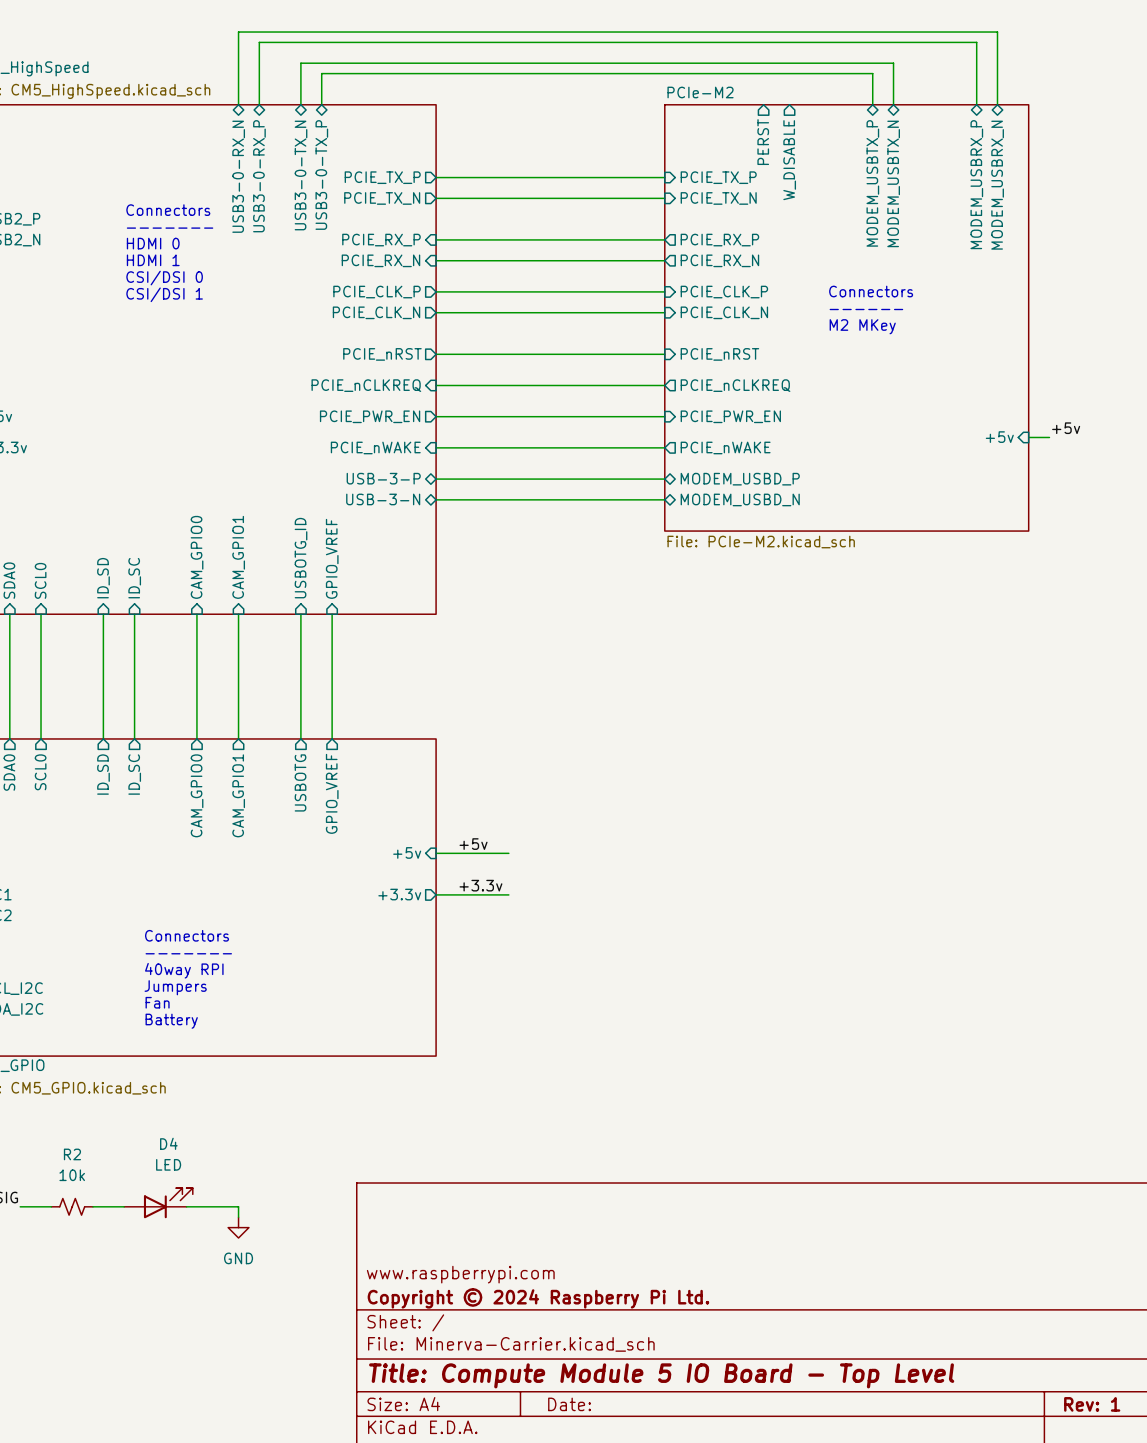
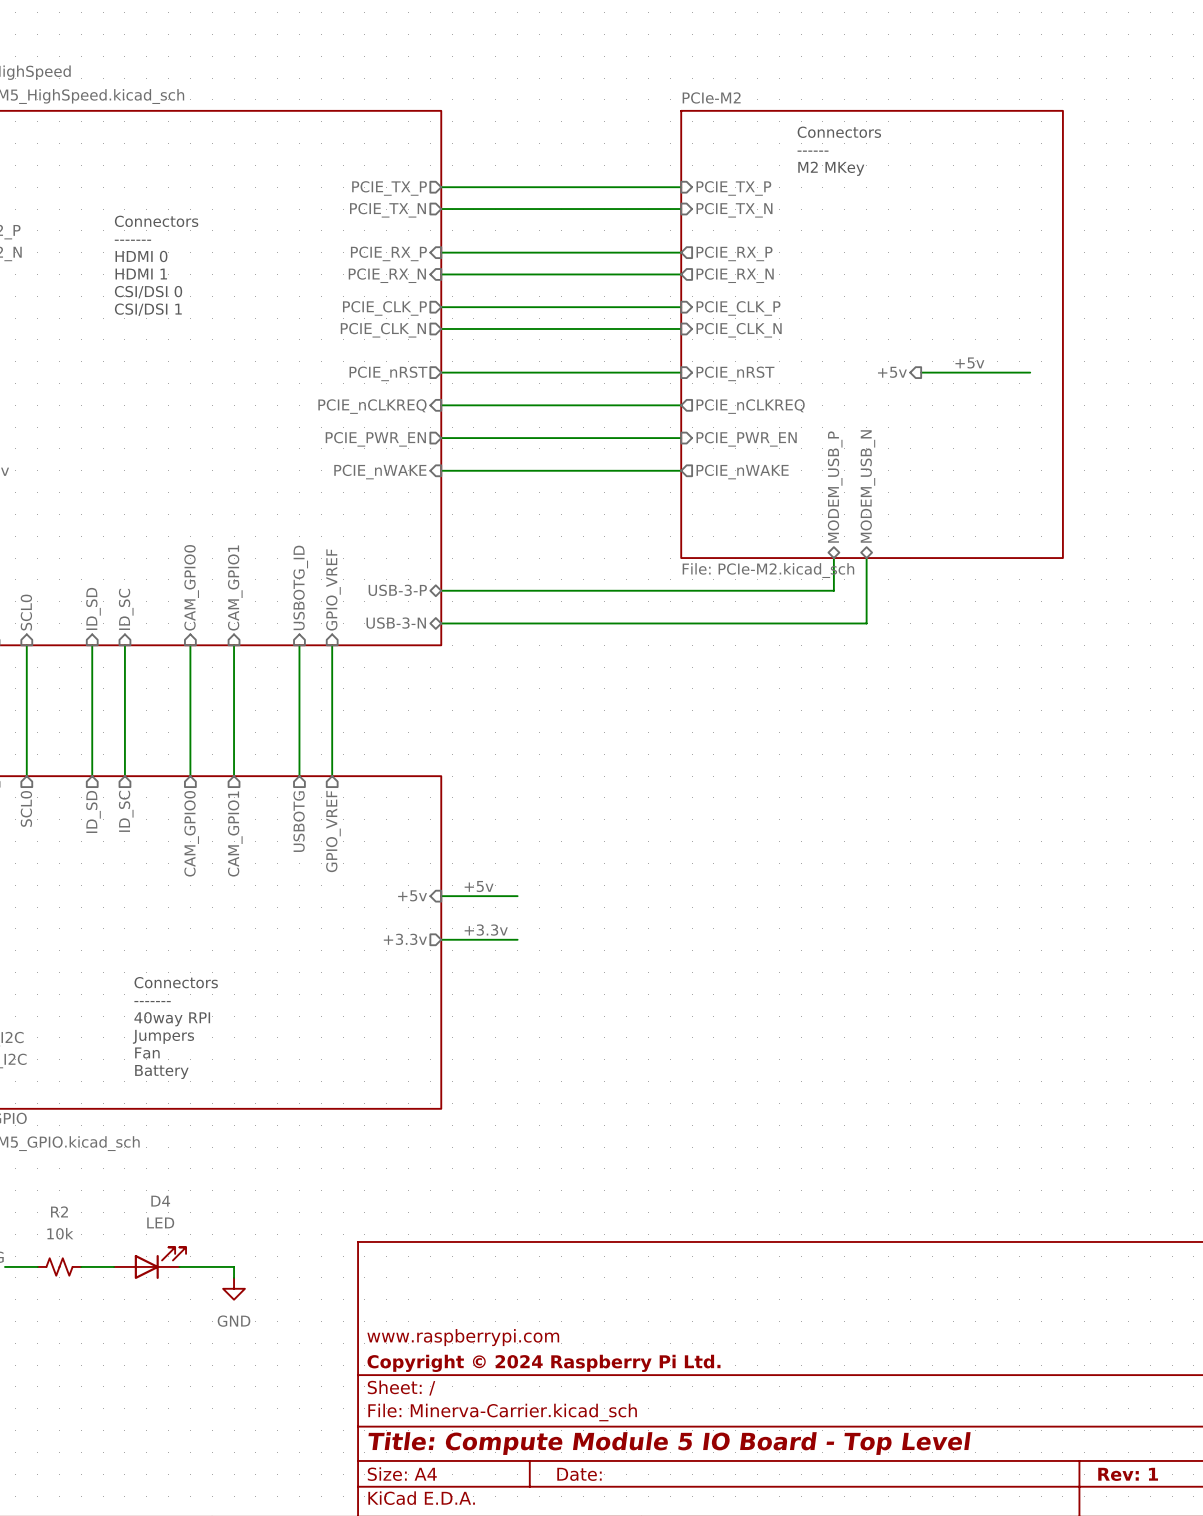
wire: (238, 104) (238, 32) (997, 32) (997, 104) -> none
wire: (259, 104) (259, 42) (976, 42) (976, 104) -> none
wire: (300, 104) (300, 63) (893, 63) (893, 104) -> none
wire: (321, 104) (321, 73) (872, 73) (872, 104) -> none
sheet pin: PERST (763, 142) -> none
sheet pin: W_DISABLE (789, 160) -> none
sheet pin: USB3-0-TX_N (301, 175) -> none
sheet pin: USB3-0-TX_P (321, 175) -> none
sheet pin: USB3-0-RX_N (238, 176) -> none
sheet pin: USB3-0-RX_P (259, 176) -> none
sheet pin: MODEM_USBTX_P (872, 183) -> none
sheet pin: MODEM_USBTX_N (893, 183) -> none
sheet pin: MODEM_USBRX_P (976, 184) -> none
sheet pin: MODEM_USBRX_N (997, 185) -> none
text position: Connectors (871, 291) -> Connectors (839, 132)
text position: ------ (866, 309) -> ------ (813, 151)
text position: M2 MKey (862, 326) -> M2 MKey (831, 168)
wire: none -> (921, 372) (1030, 372)
label position: +5v (1066, 428) -> +5v (969, 362)
sheet pin position: +5v (999, 437) -> +5v (892, 372)
wire: (1028, 437) (1049, 437) -> none
sheet pin: none -> MODEM_USB_P (835, 487)
sheet pin: none -> MODEM_USB_N (867, 486)
sheet pin position: USB-3-P (383, 478) -> USB-3-P (397, 590)
wire: (436, 479) (664, 479) -> none
sheet pin: MODEM_USBD_P (740, 479) -> none
sheet pin position: USB-3-N (383, 499) -> USB-3-N (396, 623)
wire: (436, 499) (664, 499) -> none
sheet pin: MODEM_USBD_N (740, 499) -> none
wire: none -> (833, 558) (833, 590) (441, 590)
wire: none -> (866, 558) (866, 623) (441, 623)

